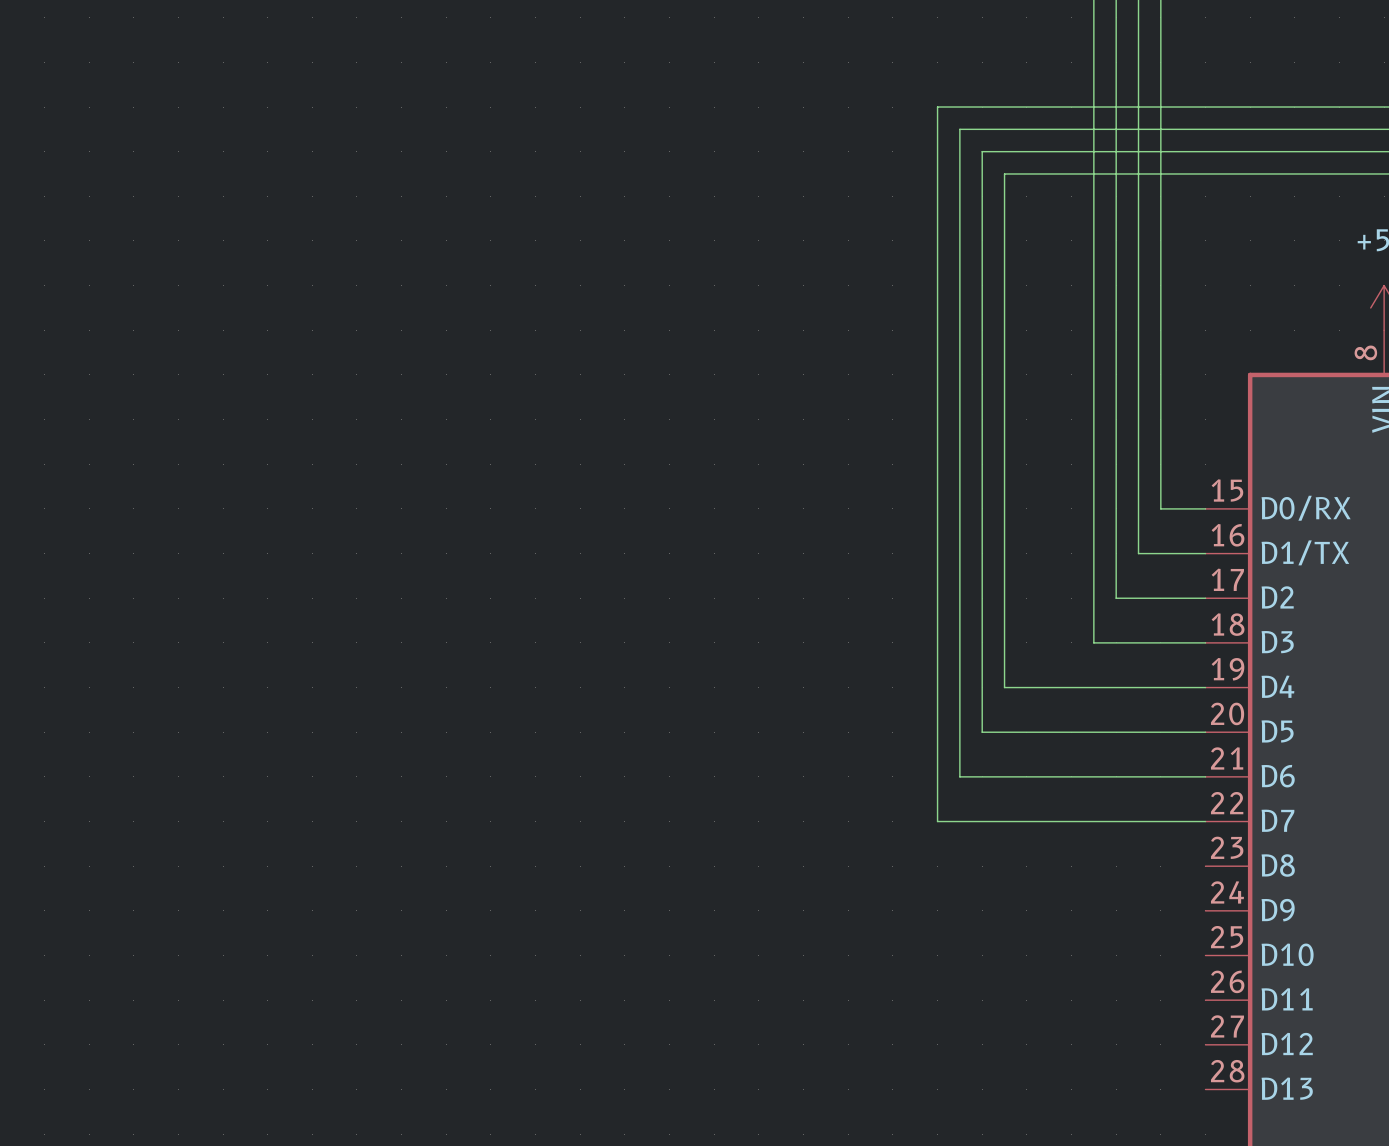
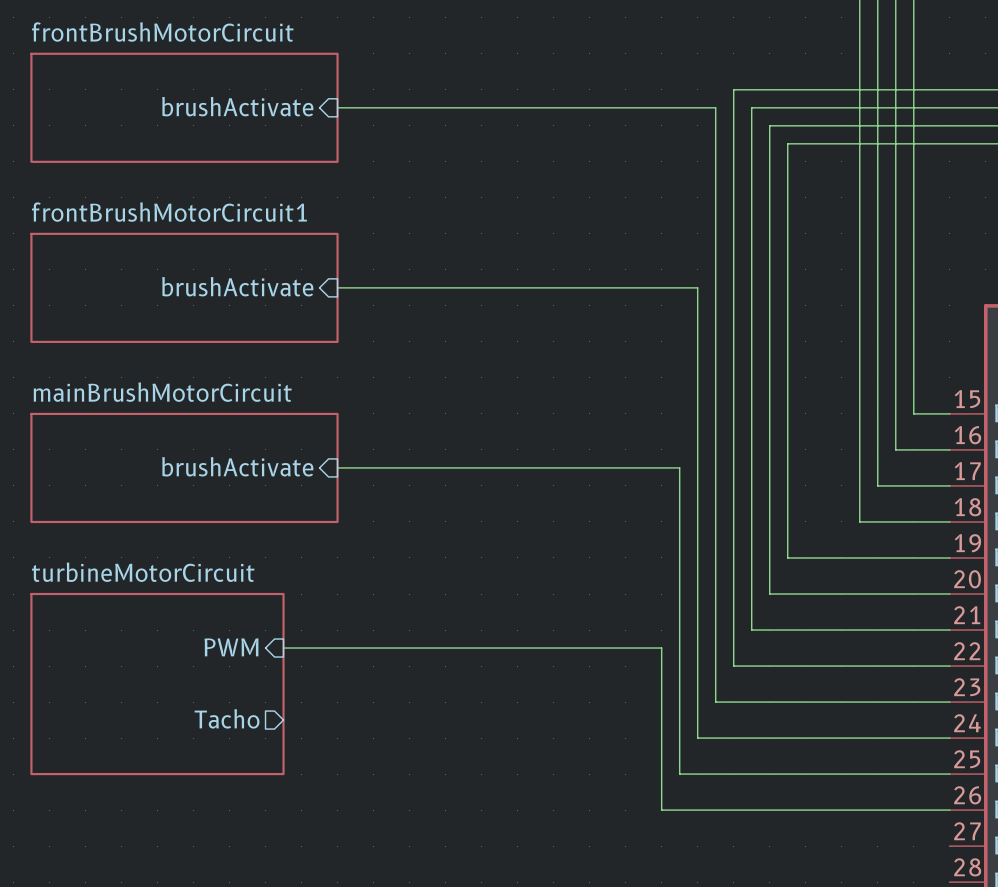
sheet pin: none -> brushActivate (237, 106)
sheet frontBrushMotorCircuit: none -> (184, 107)
wire: none -> (337, 107) (715, 107) (715, 702) (949, 702)
sheet pin: none -> brushActivate (237, 286)
sheet frontBrushMotorCircuit1: none -> (184, 287)
wire: none -> (337, 287) (697, 287) (697, 738) (949, 738)
sheet pin: none -> brushActivate (237, 466)
sheet mainBrushMotorCircuit: none -> (184, 467)
wire: none -> (337, 467) (679, 467) (679, 774) (949, 774)
sheet pin: none -> PWM (231, 647)
wire: none -> (283, 648) (661, 648) (661, 810) (949, 810)
sheet turbineMotorCircuit: none -> (157, 684)
sheet pin: none -> Tacho (227, 718)

